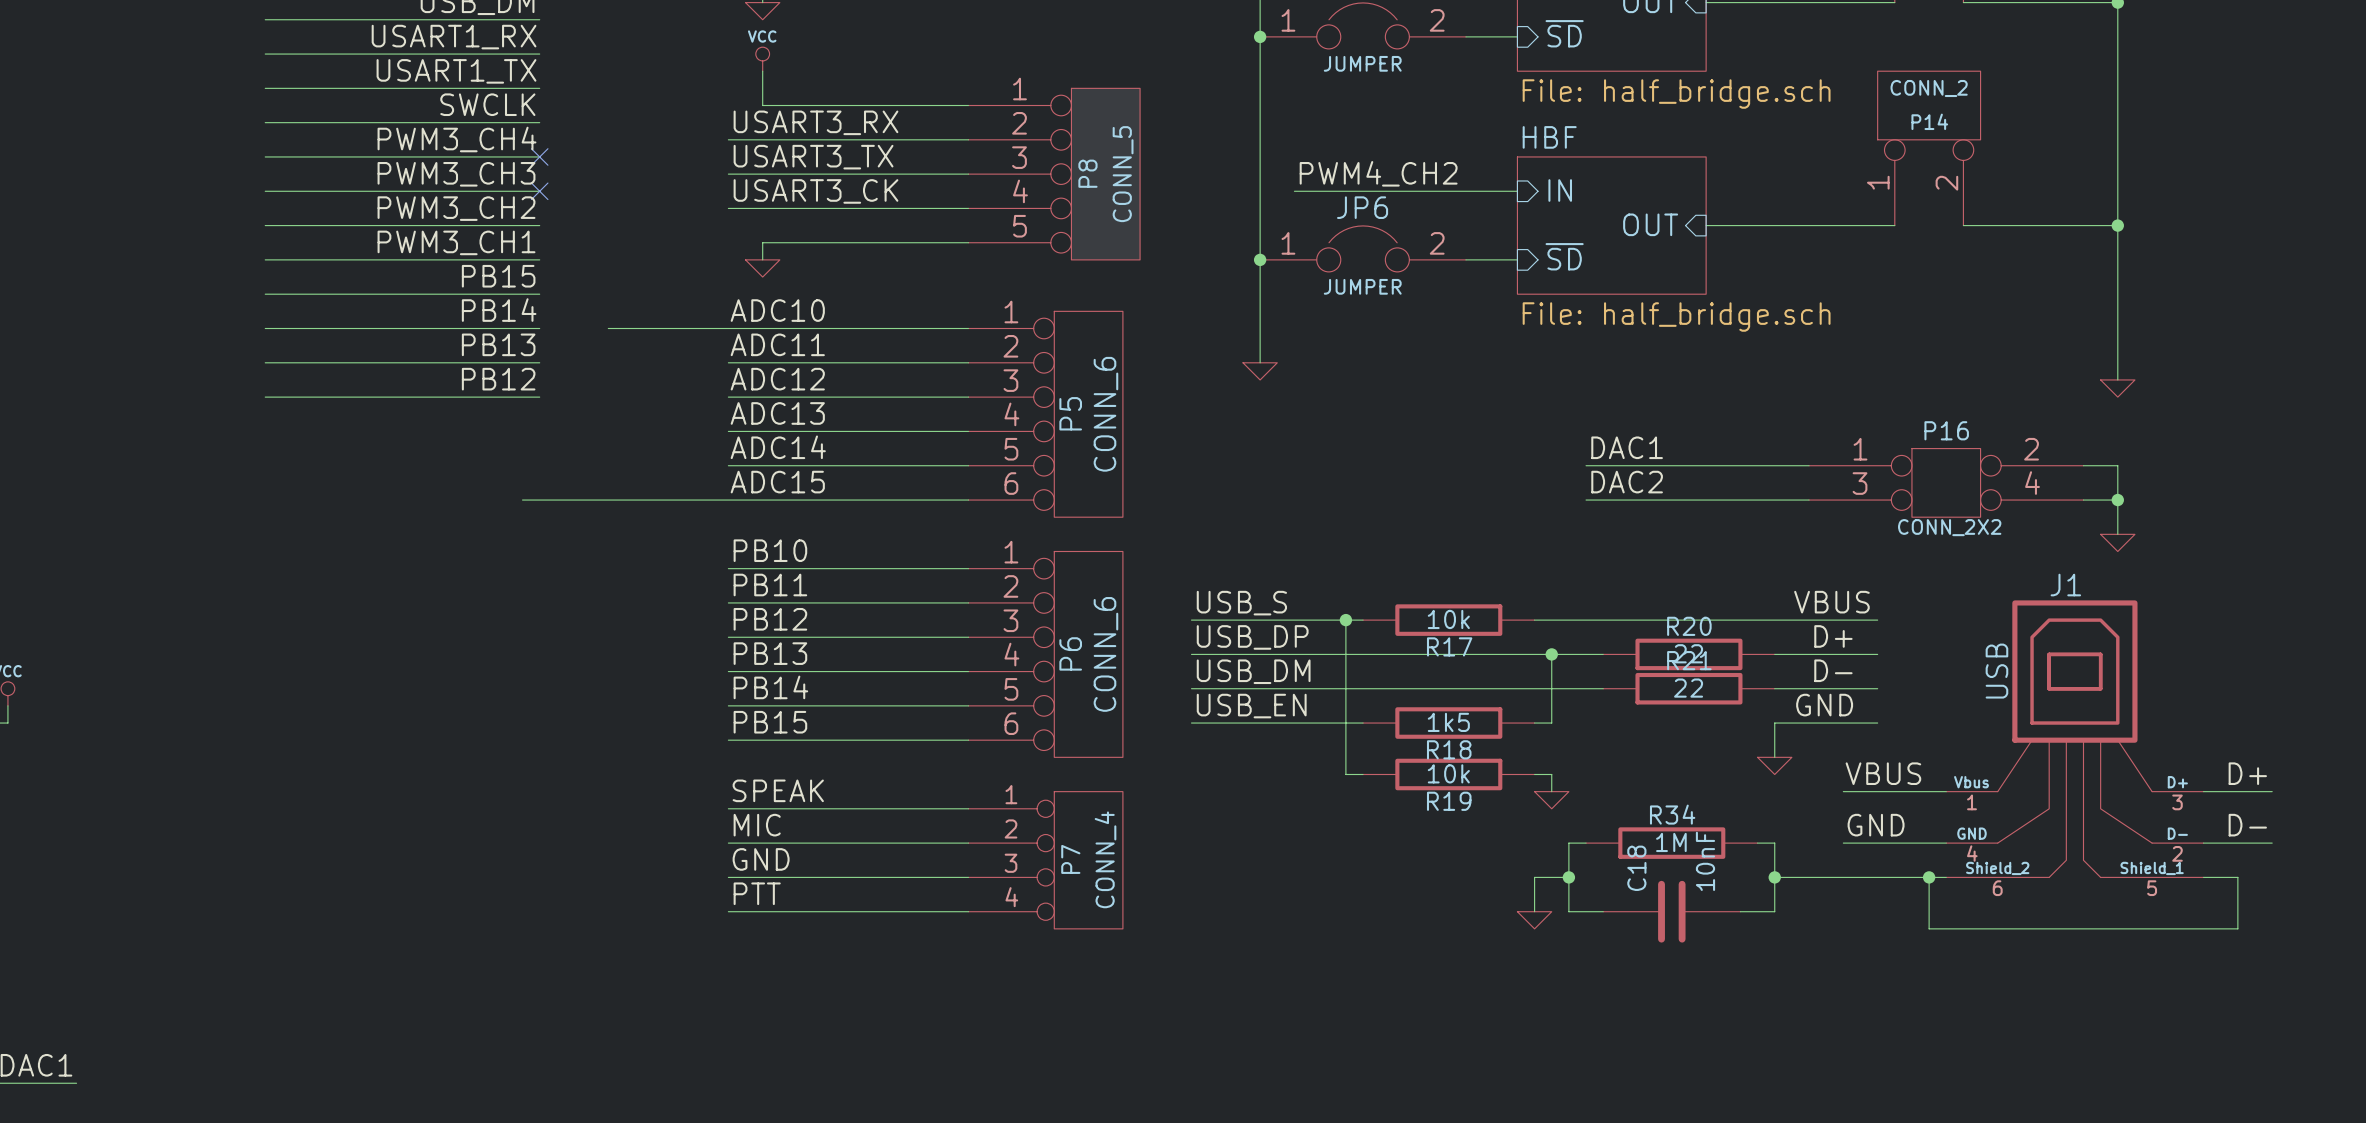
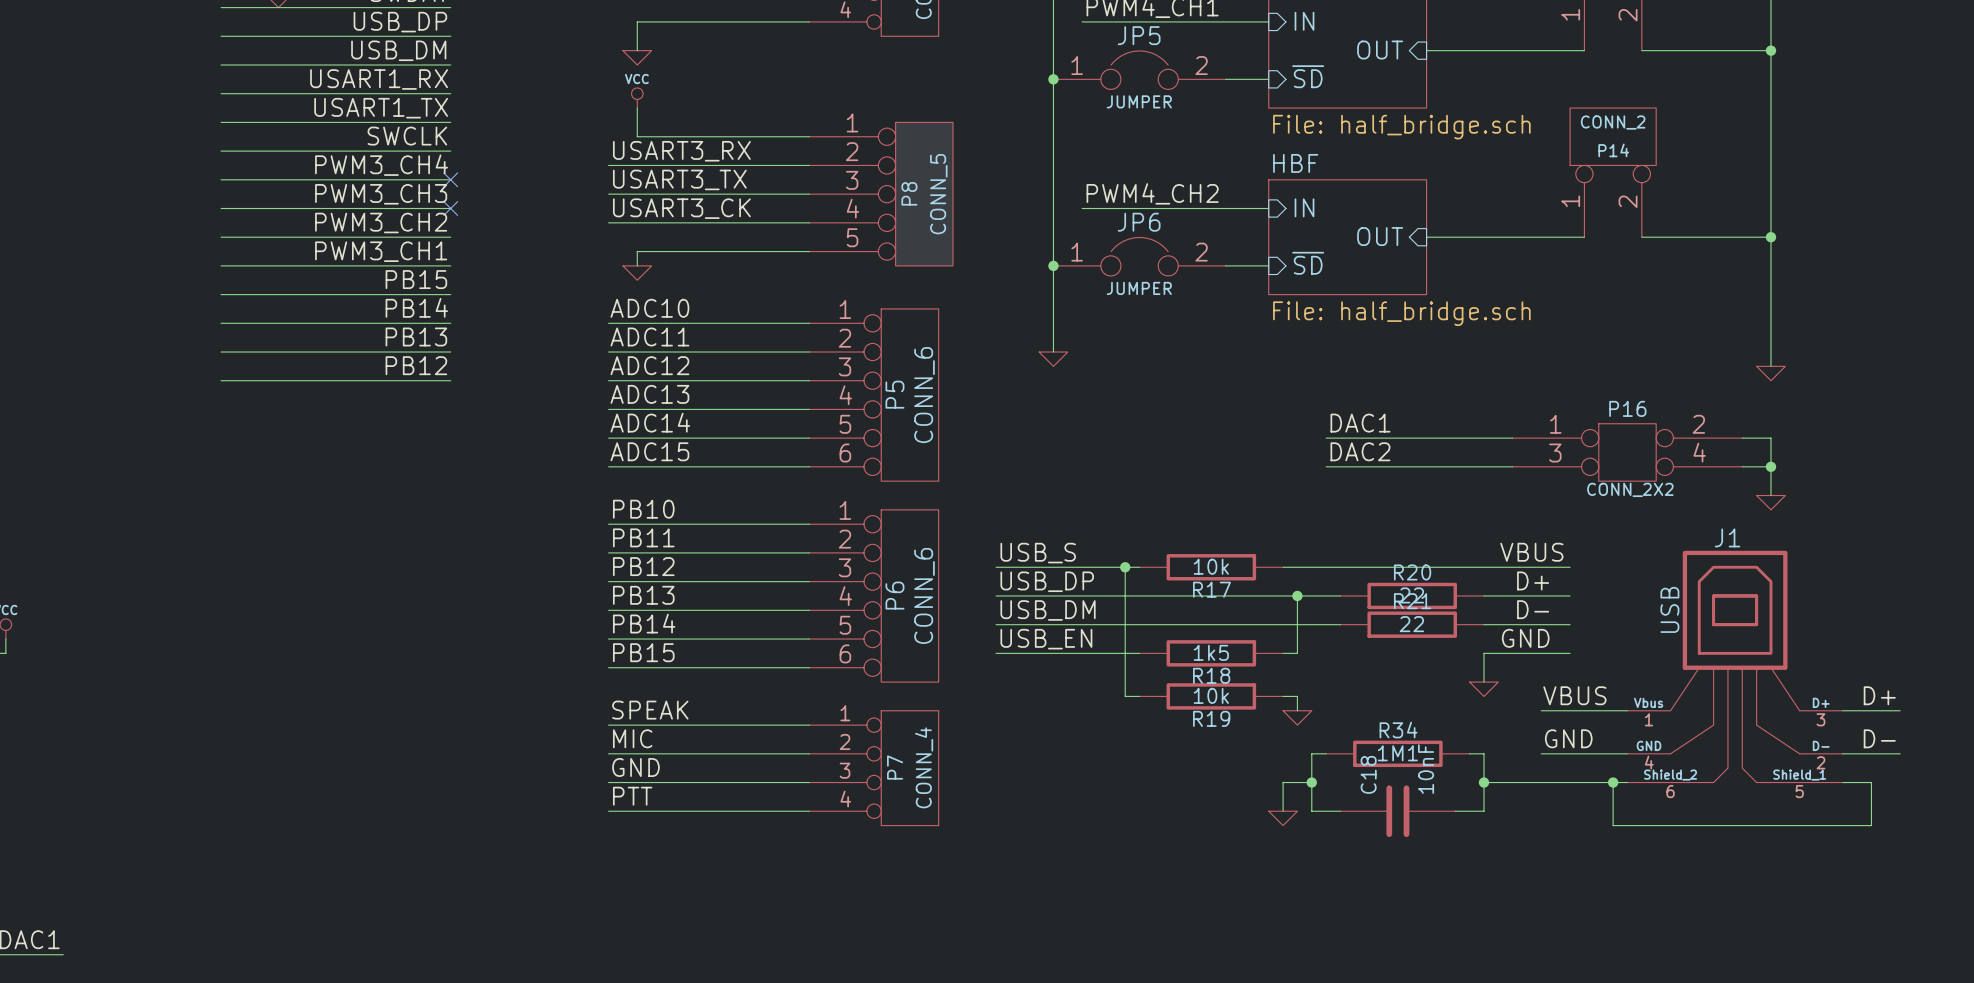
wire: (608, 328) (728, 328) -> none
wire: (522, 500) (728, 500) -> none
R34 value: 1M (1671, 842) -> 1M1 (1397, 753)

